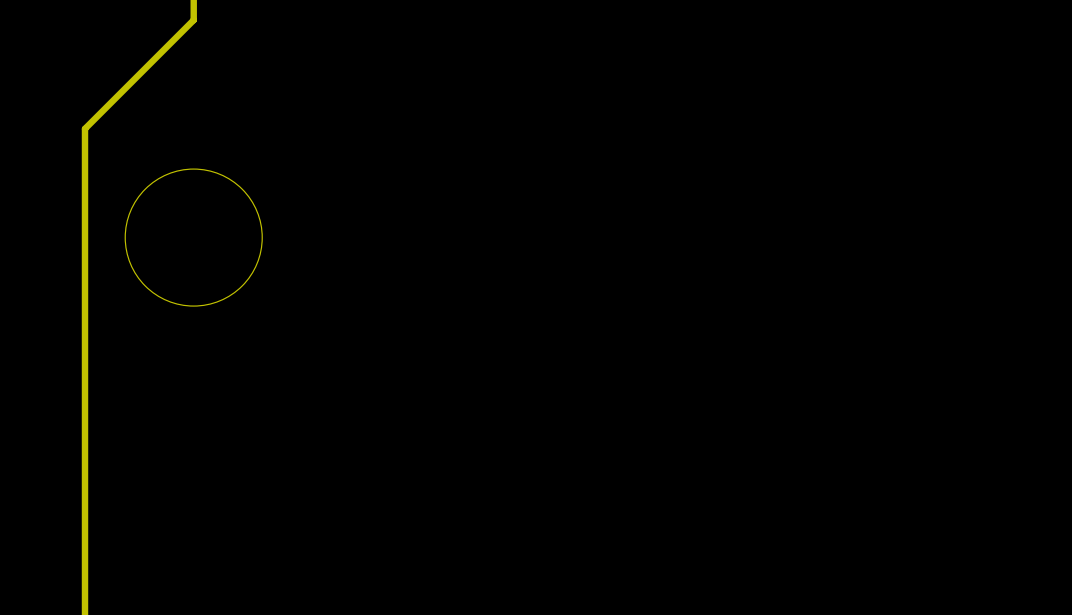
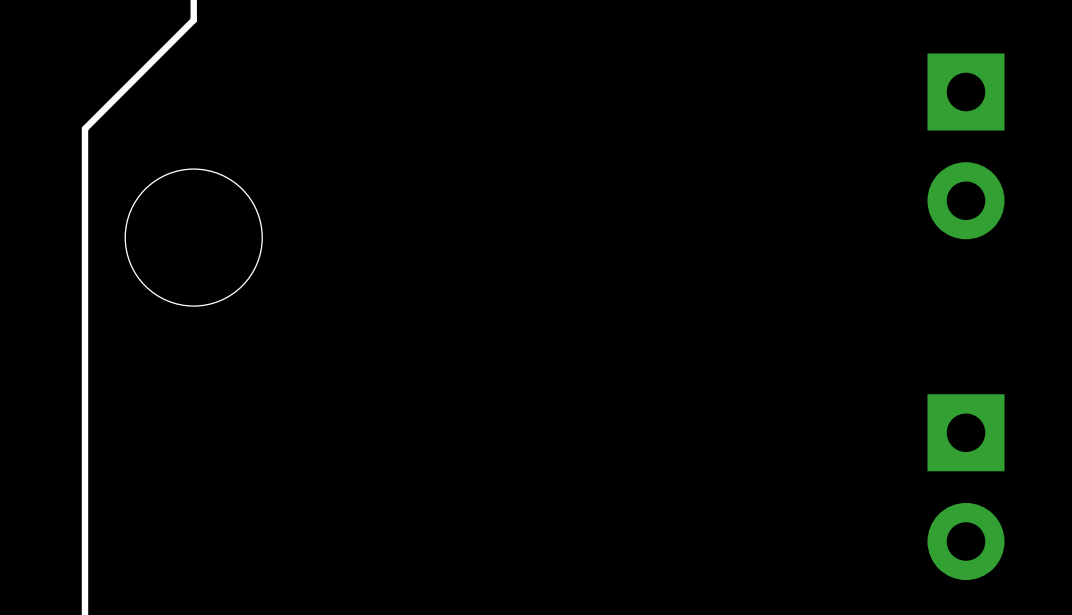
part: none -> (966, 146)
part: none -> (966, 487)

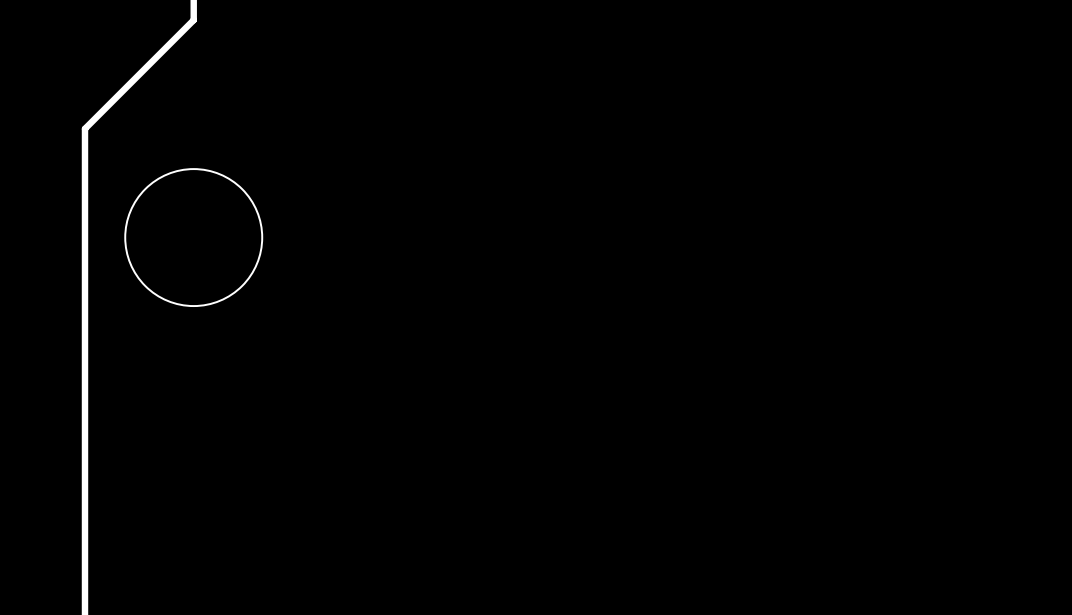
part: (966, 146) -> none
part: (966, 487) -> none

